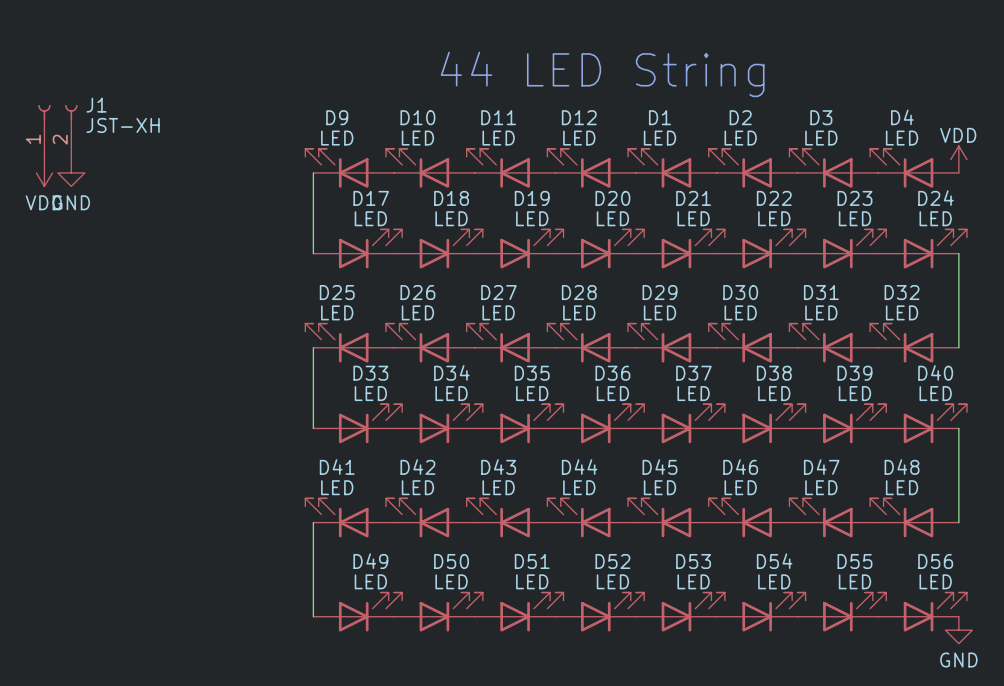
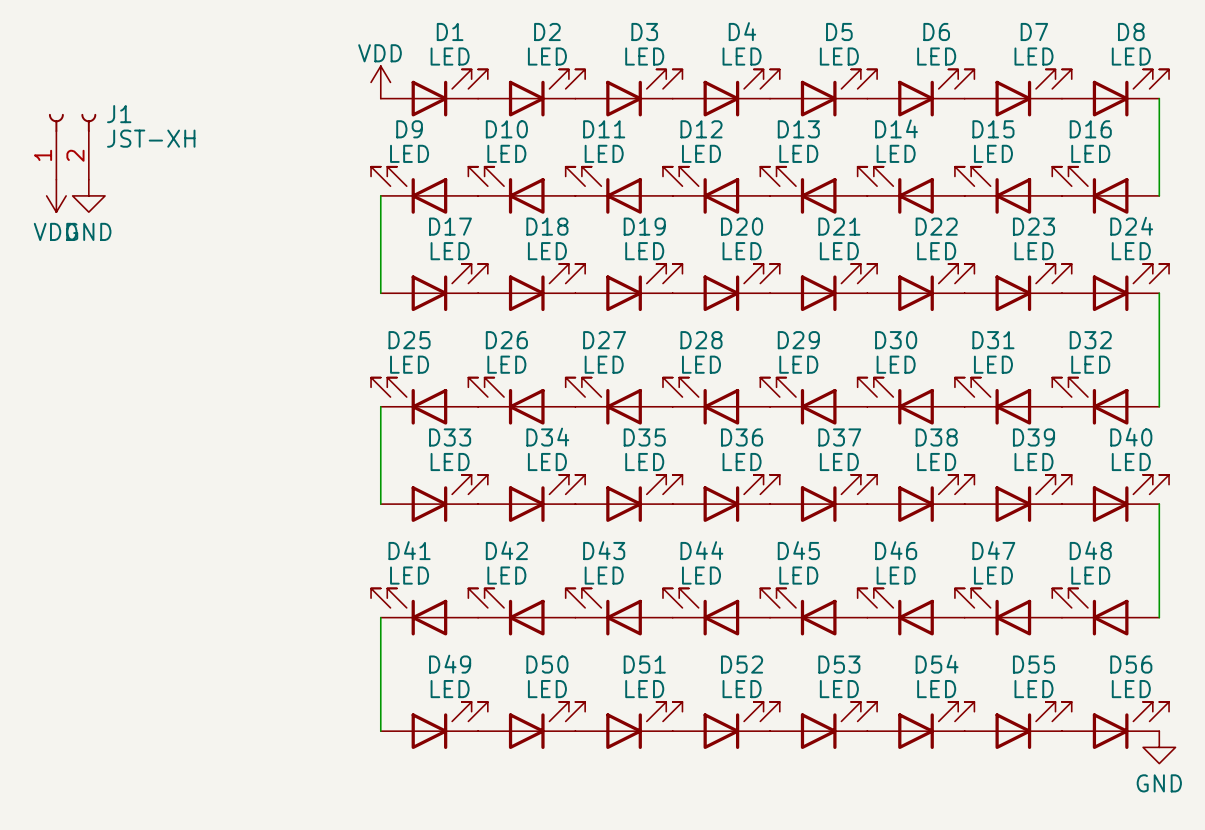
text: 44 LED String (602, 74) -> none
power symbol: none -> VDD (380, 82)
D1: none -> LED (434, 92)
D2: none -> LED (531, 92)
D3: none -> LED (628, 92)
D4: none -> LED (726, 92)
D5: none -> LED (823, 92)
D6: none -> LED (920, 92)
D7: none -> LED (1018, 92)
D8: none -> LED (1115, 92)
wire: none -> (1159, 98) (1159, 195)
D1 name: D1 (659, 117) -> D13 (798, 129)
D2 name: D2 (740, 117) -> D14 (896, 128)
D3 name: D3 (821, 117) -> D15 (993, 129)
D4 name: D4 (902, 117) -> D16 (1090, 129)
power symbol: VDD (958, 159) -> none

